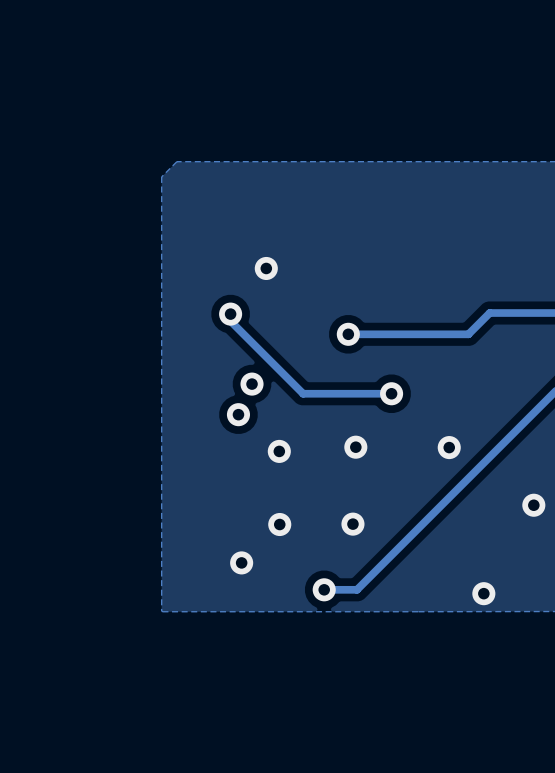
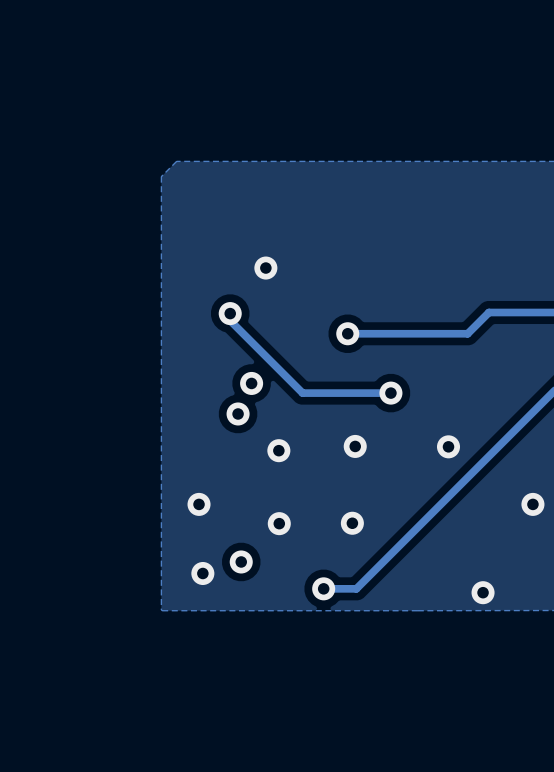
via: none -> (199, 504)
via: none -> (202, 573)

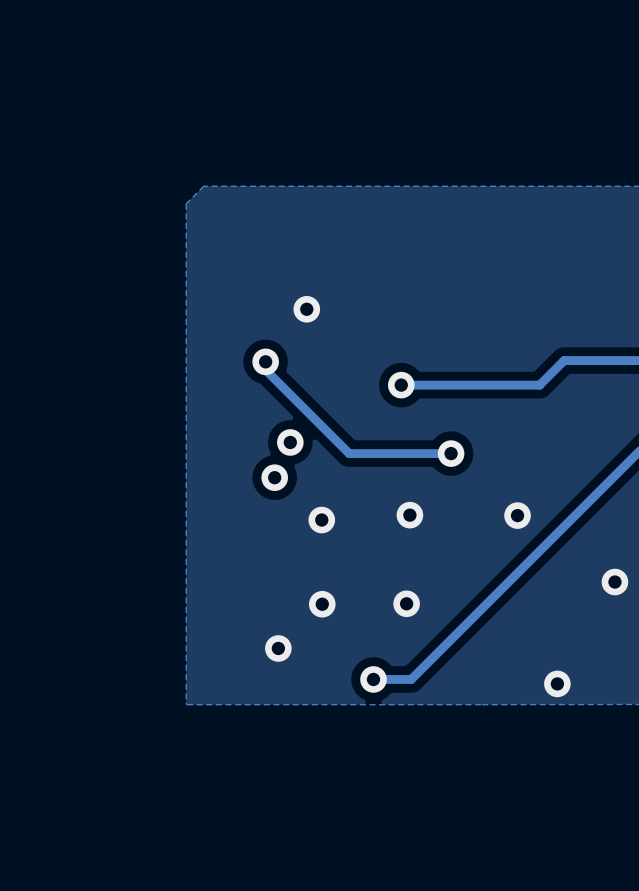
via: (199, 504) -> none
via: (202, 573) -> none

